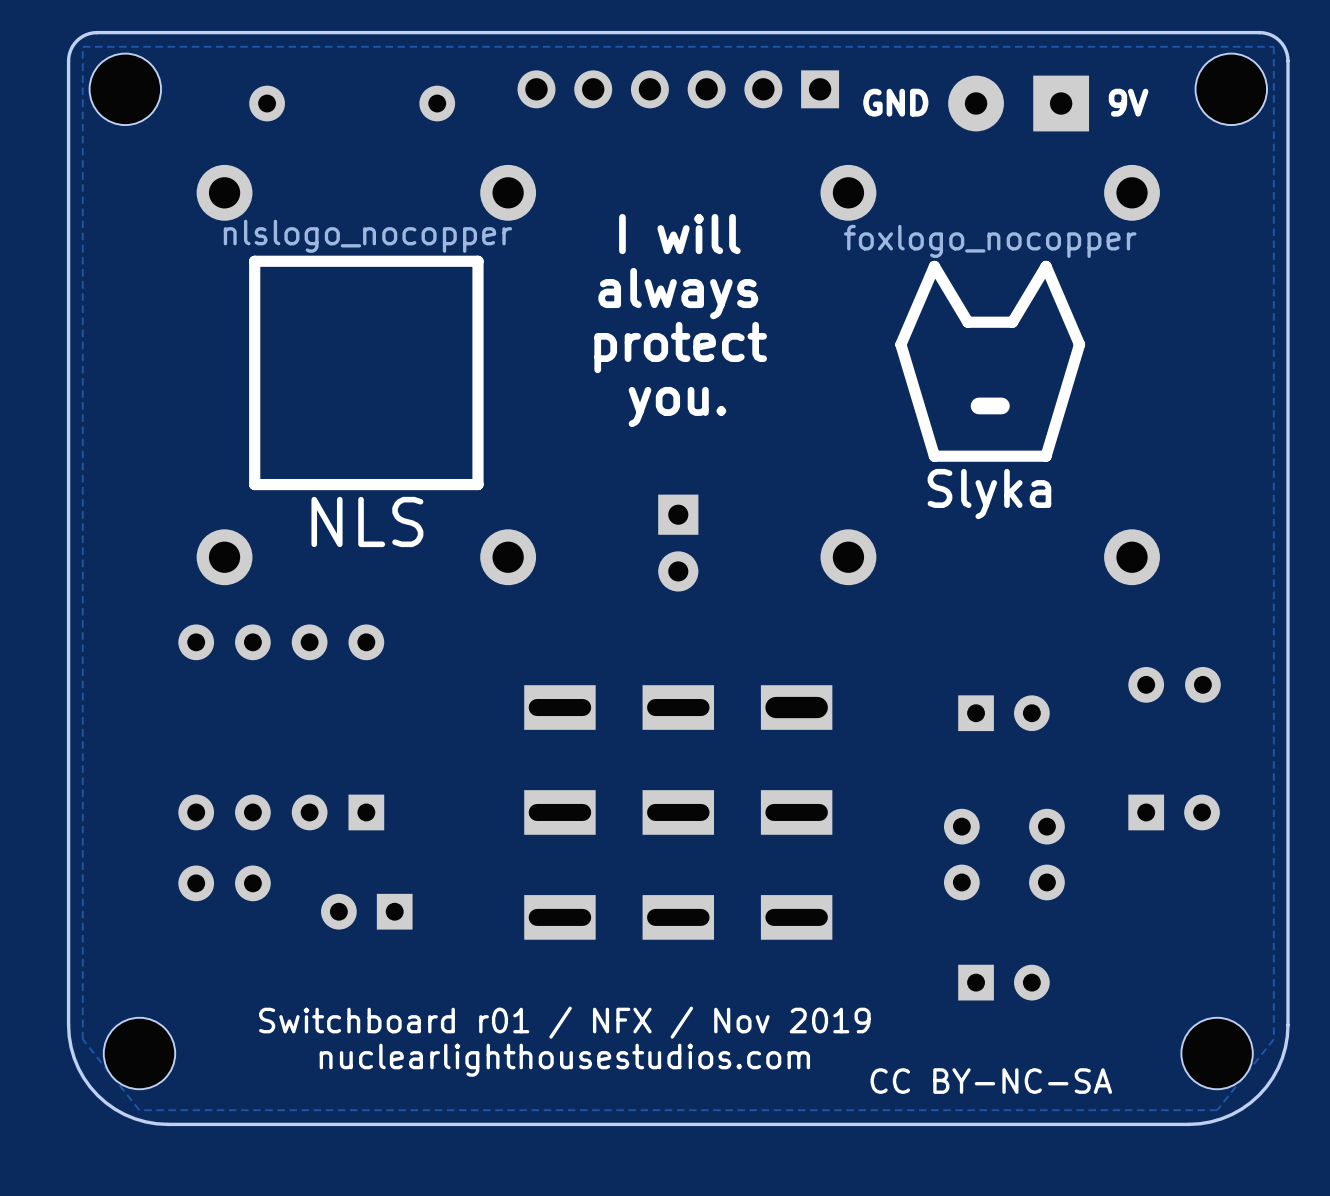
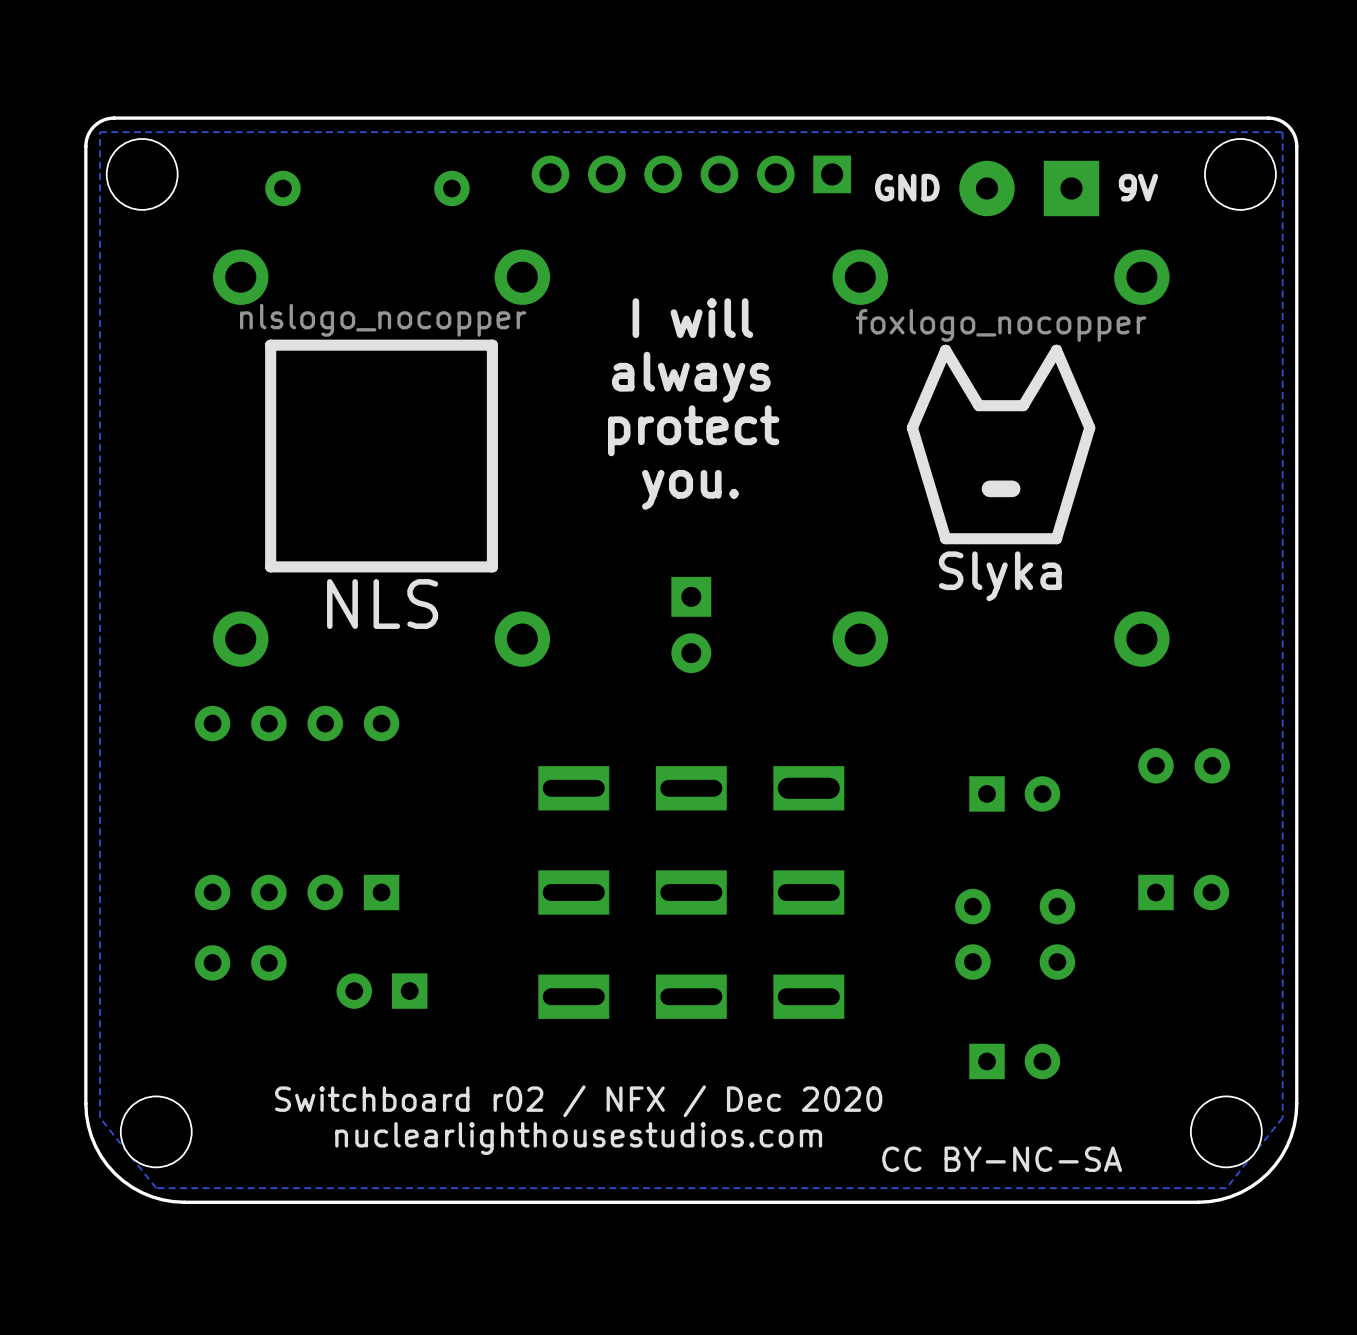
text: Switchboard r01 / NFX / Nov 2019 (564, 1022) -> Switchboard r02 / NFX / Dec 2020 (578, 1101)

